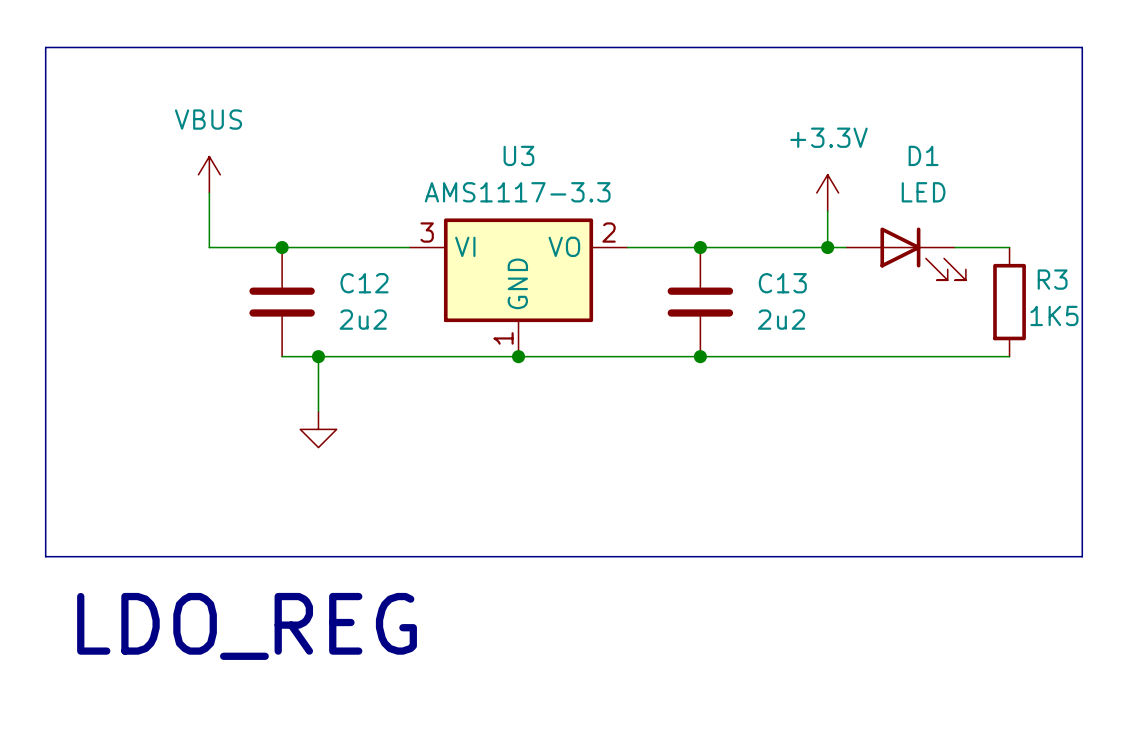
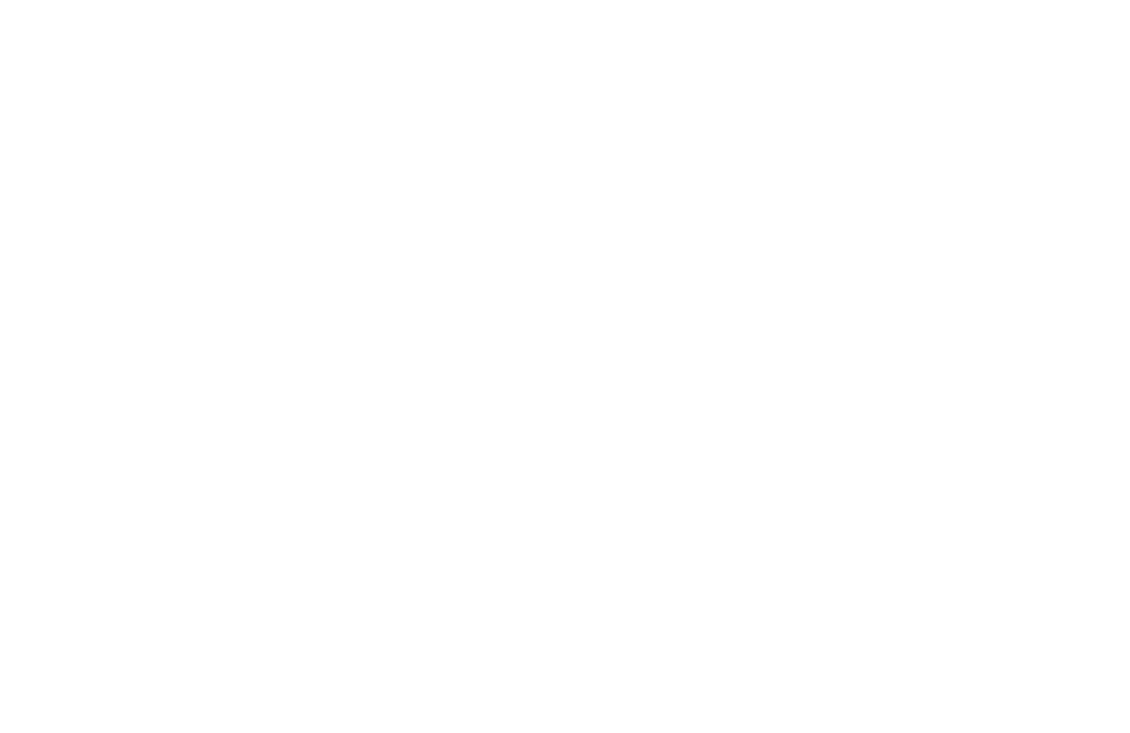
line: (45, 47) (1082, 47) (1082, 556) (45, 556) (45, 47) -> none
power symbol: VBUS (209, 174) -> none
wire: (209, 192) (209, 247) (409, 247) -> none
power symbol: +3.3V (827, 192) -> none
wire: (827, 211) (827, 247) -> none
junction: (282, 247) -> none
wire: (627, 247) (845, 247) -> none
junction: (700, 247) -> none
junction: (827, 247) -> none
wire: (954, 247) (1009, 247) -> none
D1: LED (905, 253) -> none
U3: AMS1117-3.3 (518, 287) -> none
C12: 2u2 (282, 302) -> none
C13: 2u2 (700, 302) -> none
R3: 1K5 (1009, 302) -> none
wire: (282, 356) (1009, 356) -> none
wire: (318, 356) (318, 411) -> none
junction: (318, 356) -> none
junction: (518, 356) -> none
junction: (700, 356) -> none
power symbol: (318, 429) -> none
text: LDO_REG (247, 626) -> none

